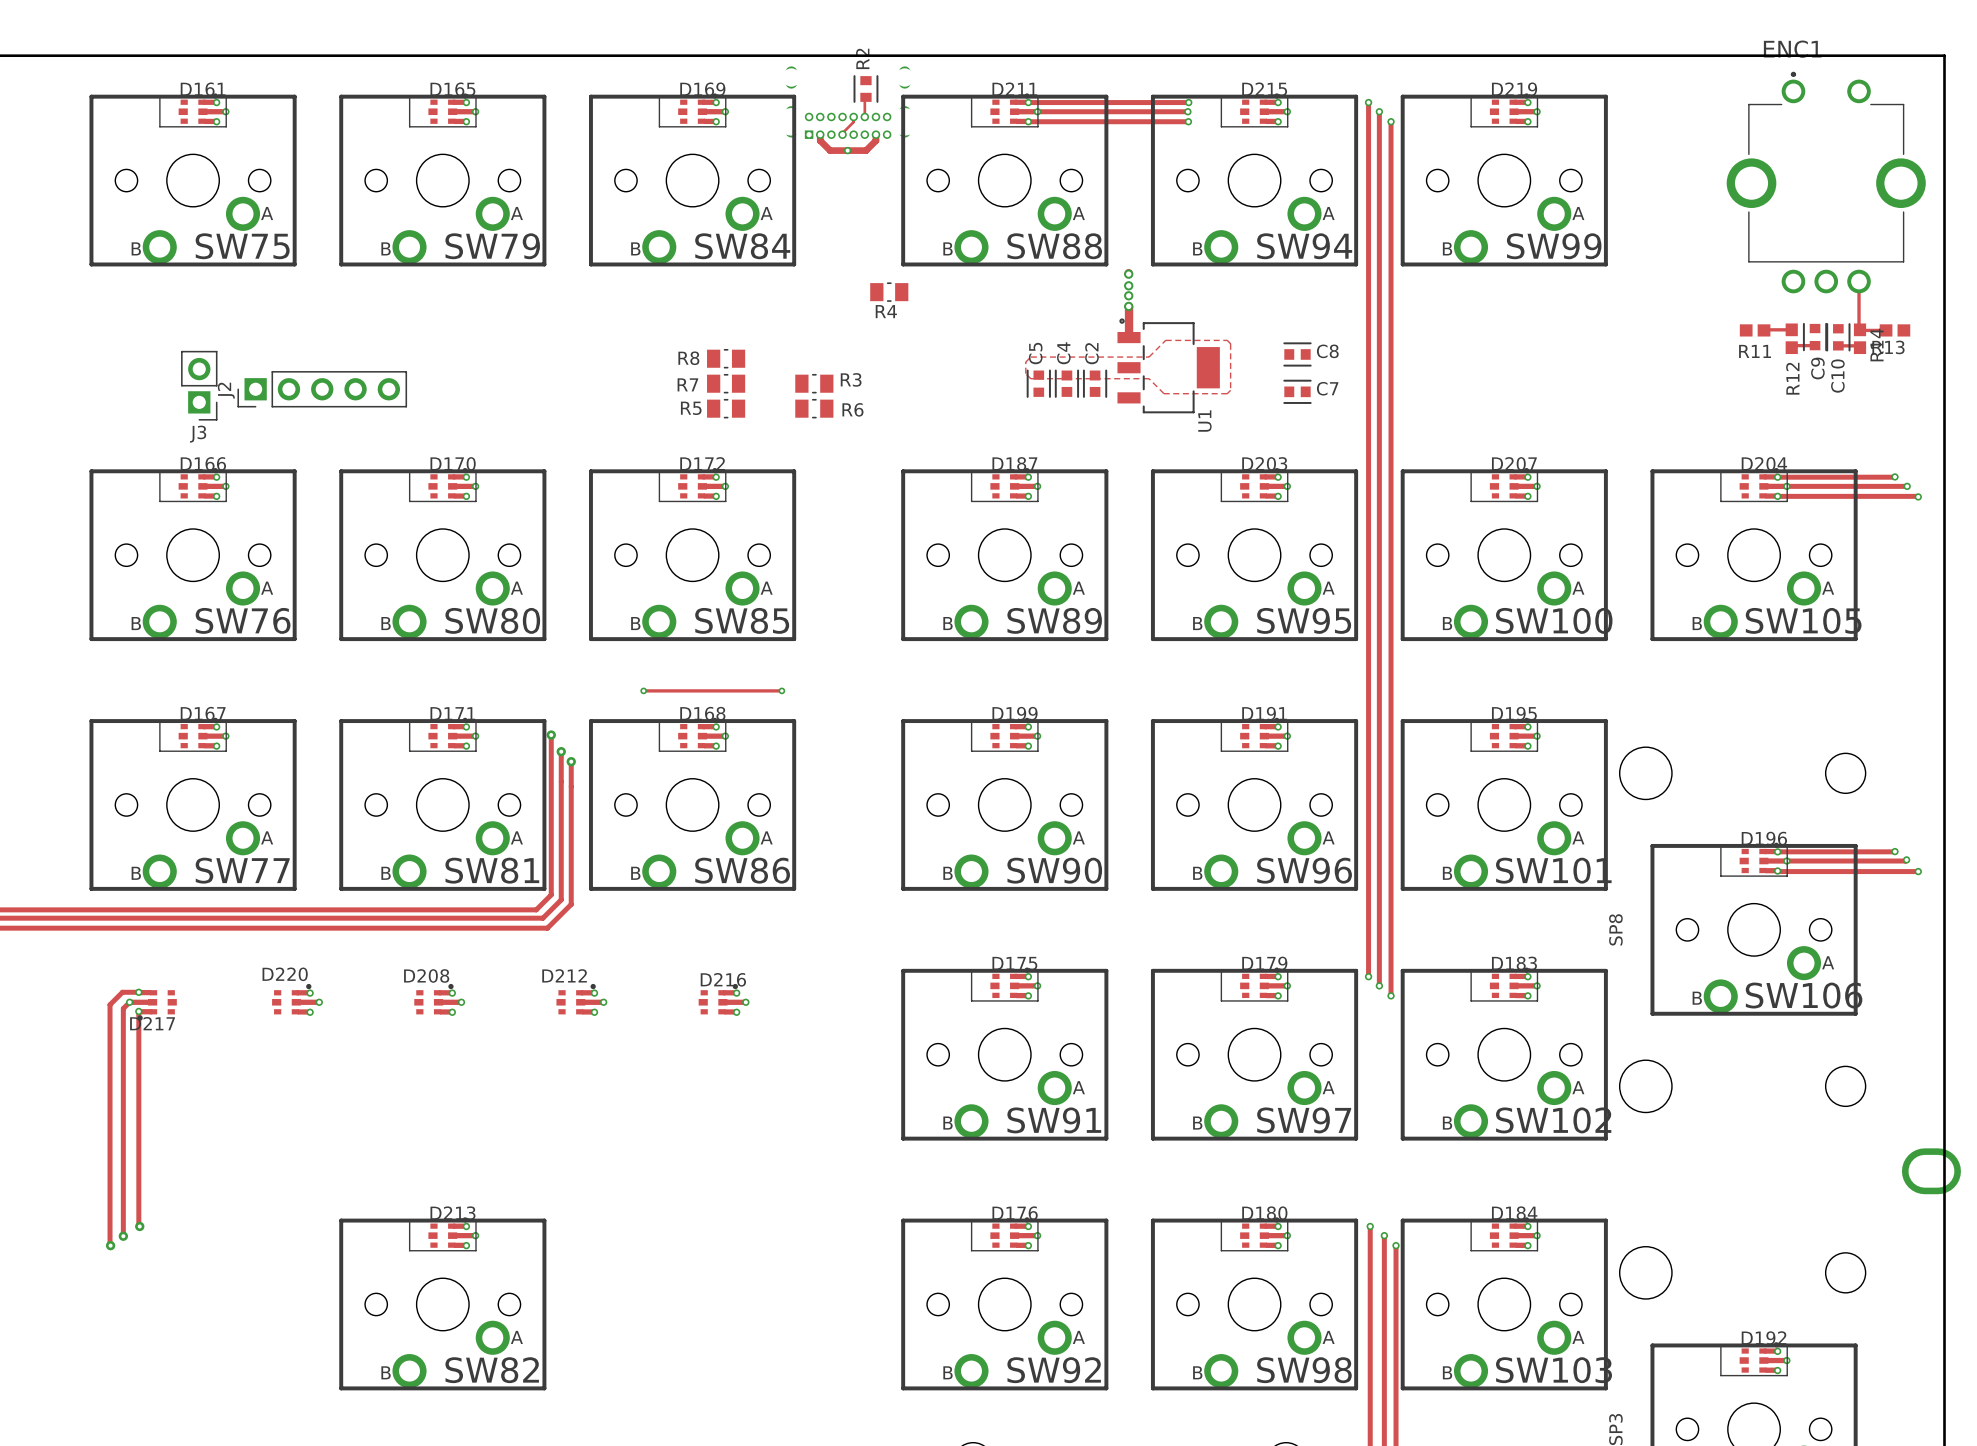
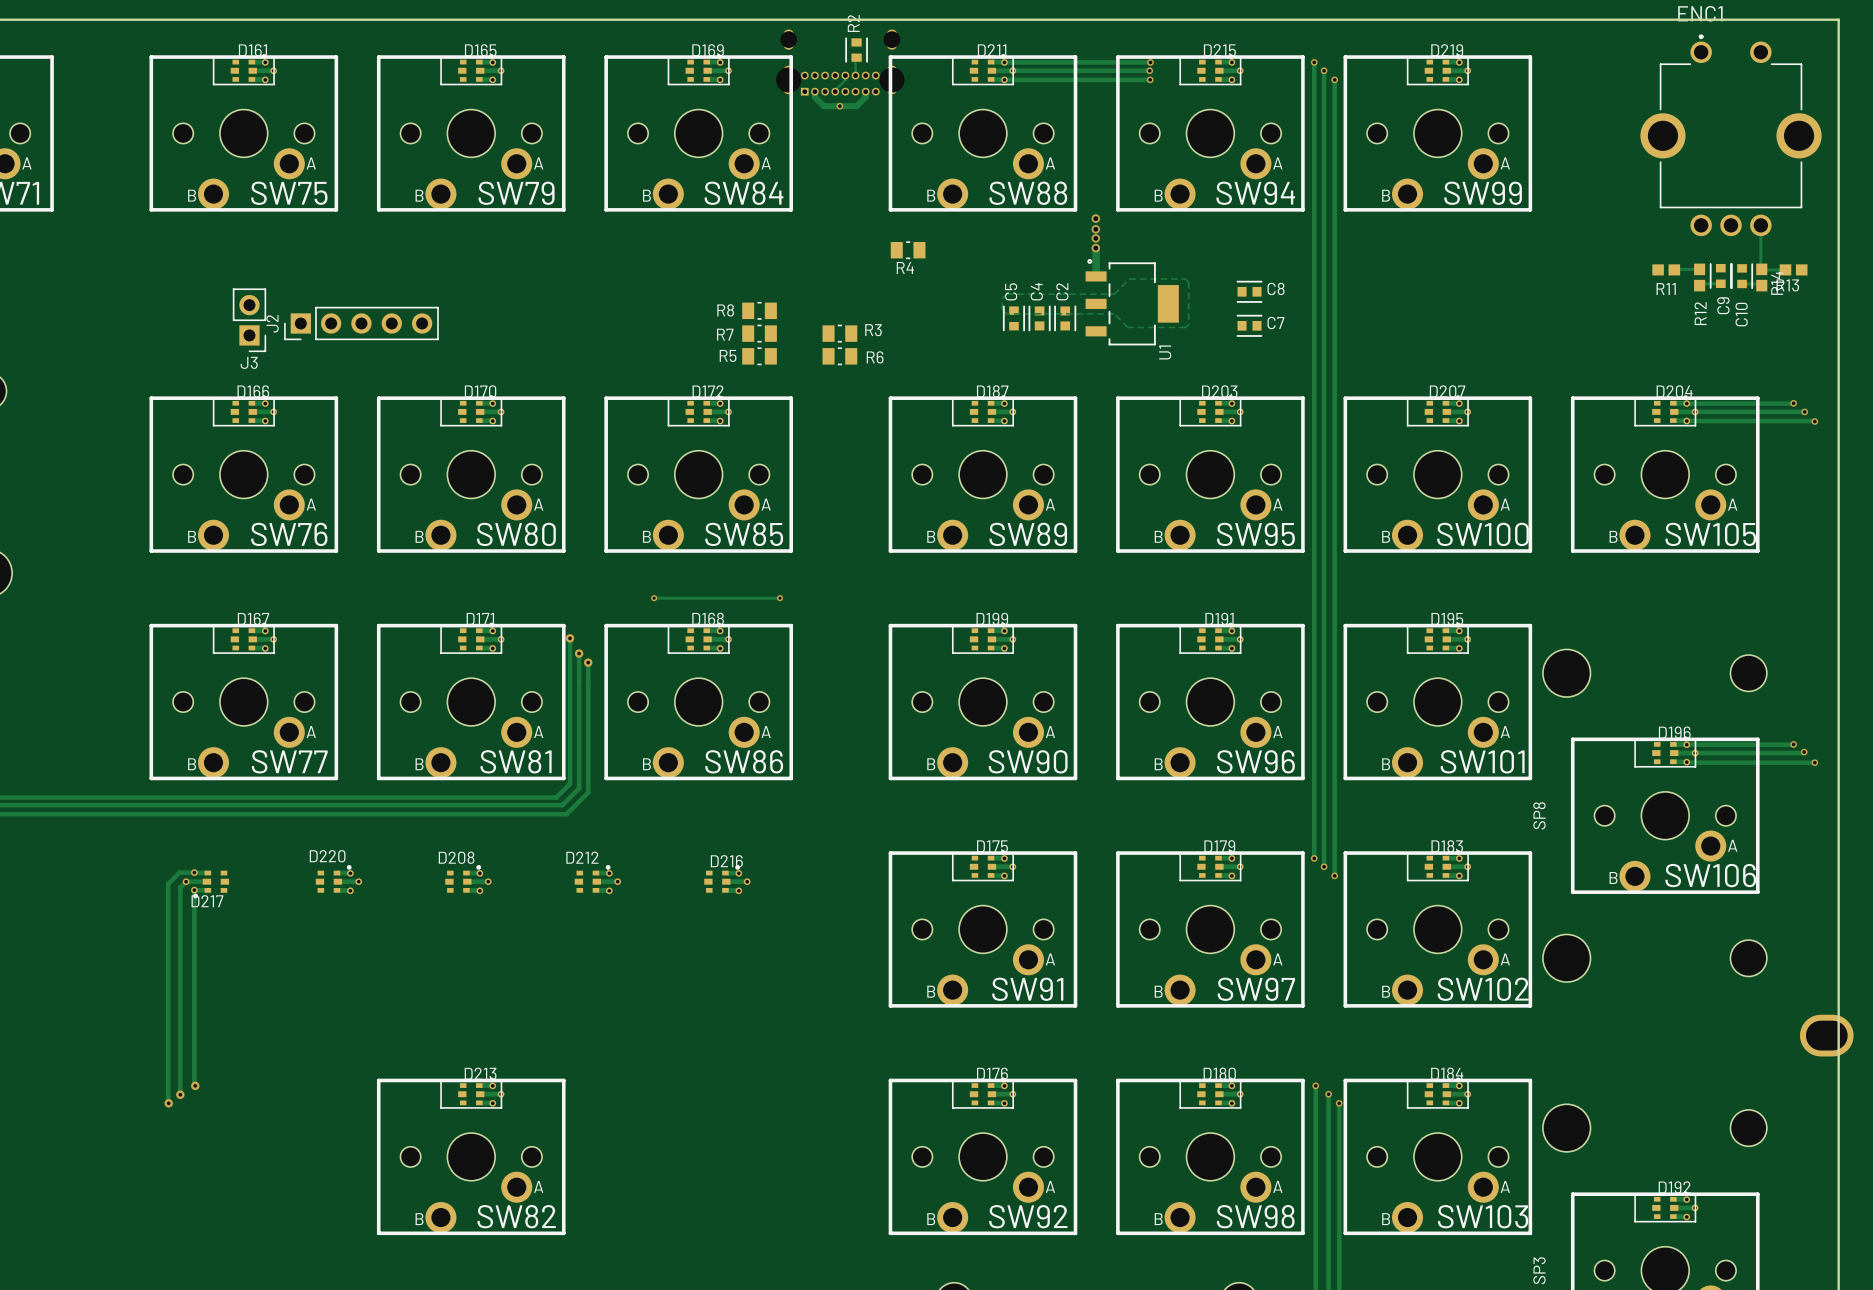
R4 position: (889, 292) -> (908, 250)
R8 position: (726, 358) -> (759, 310)
R7 position: (726, 383) -> (759, 333)
R3 position: (814, 383) -> (839, 333)
R5 position: (726, 408) -> (759, 356)
R6 position: (814, 408) -> (839, 356)

